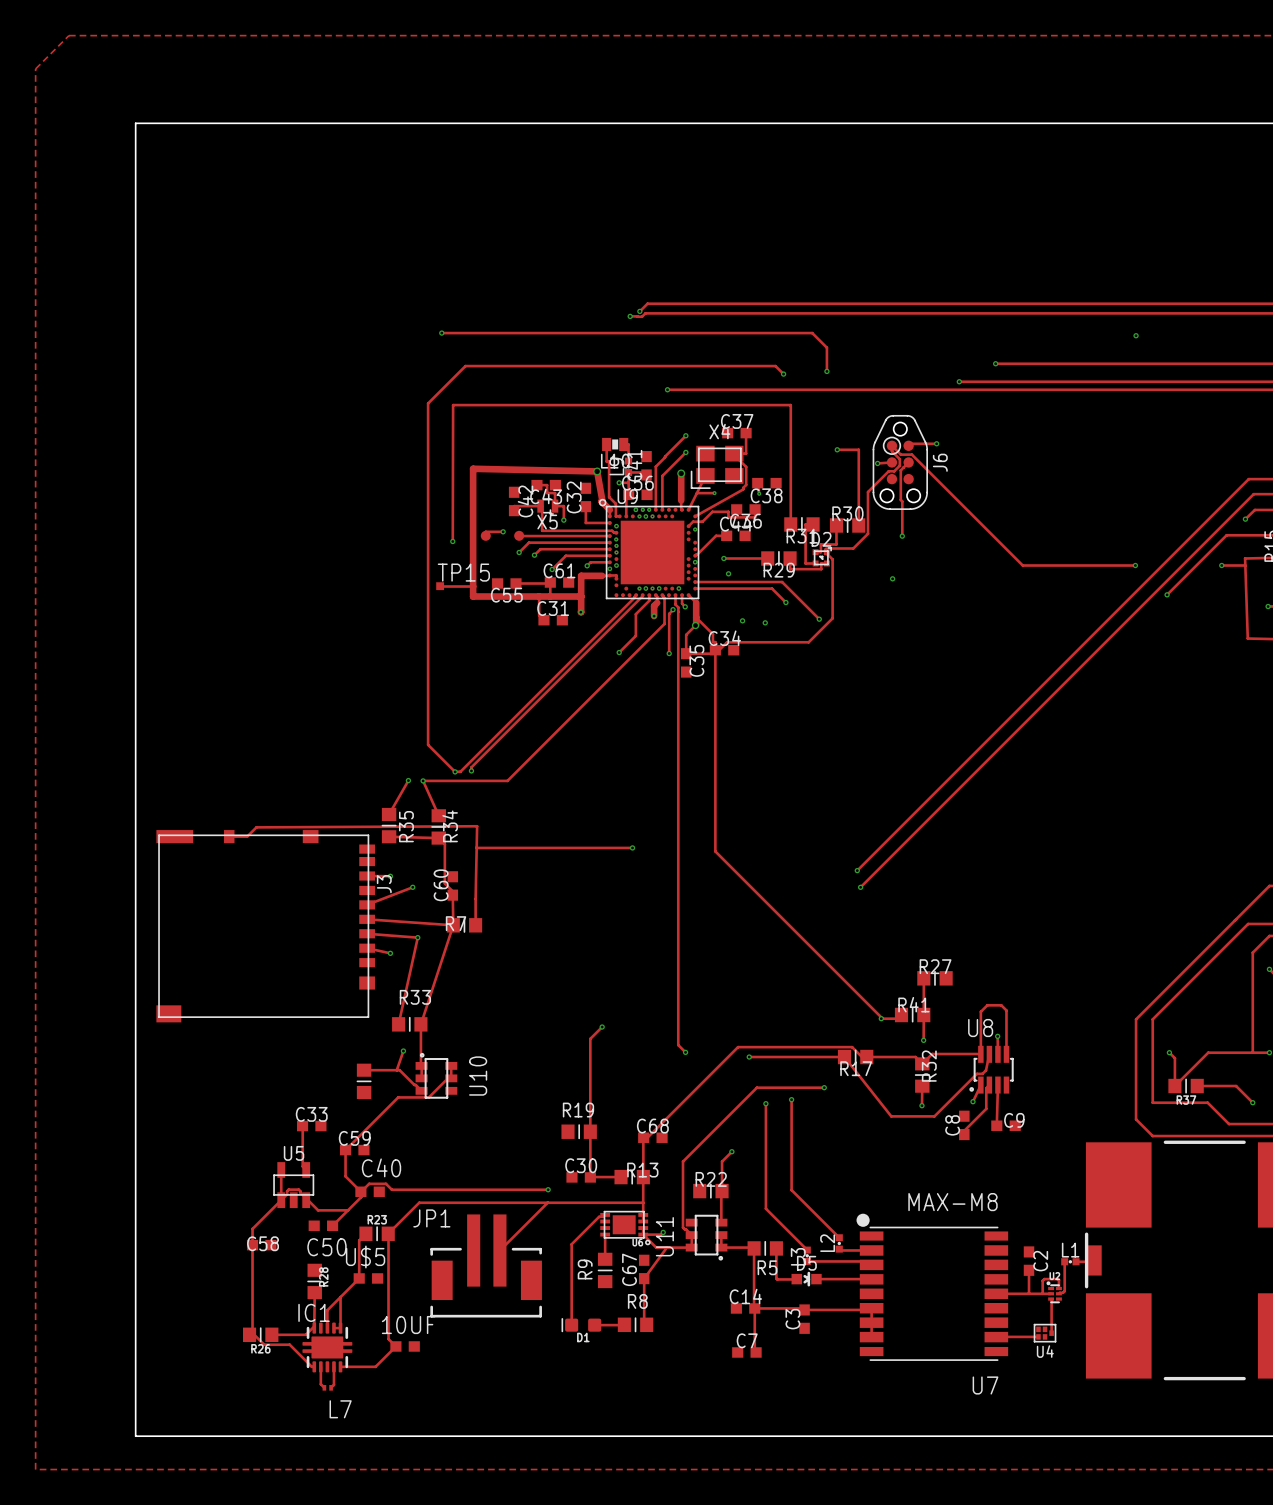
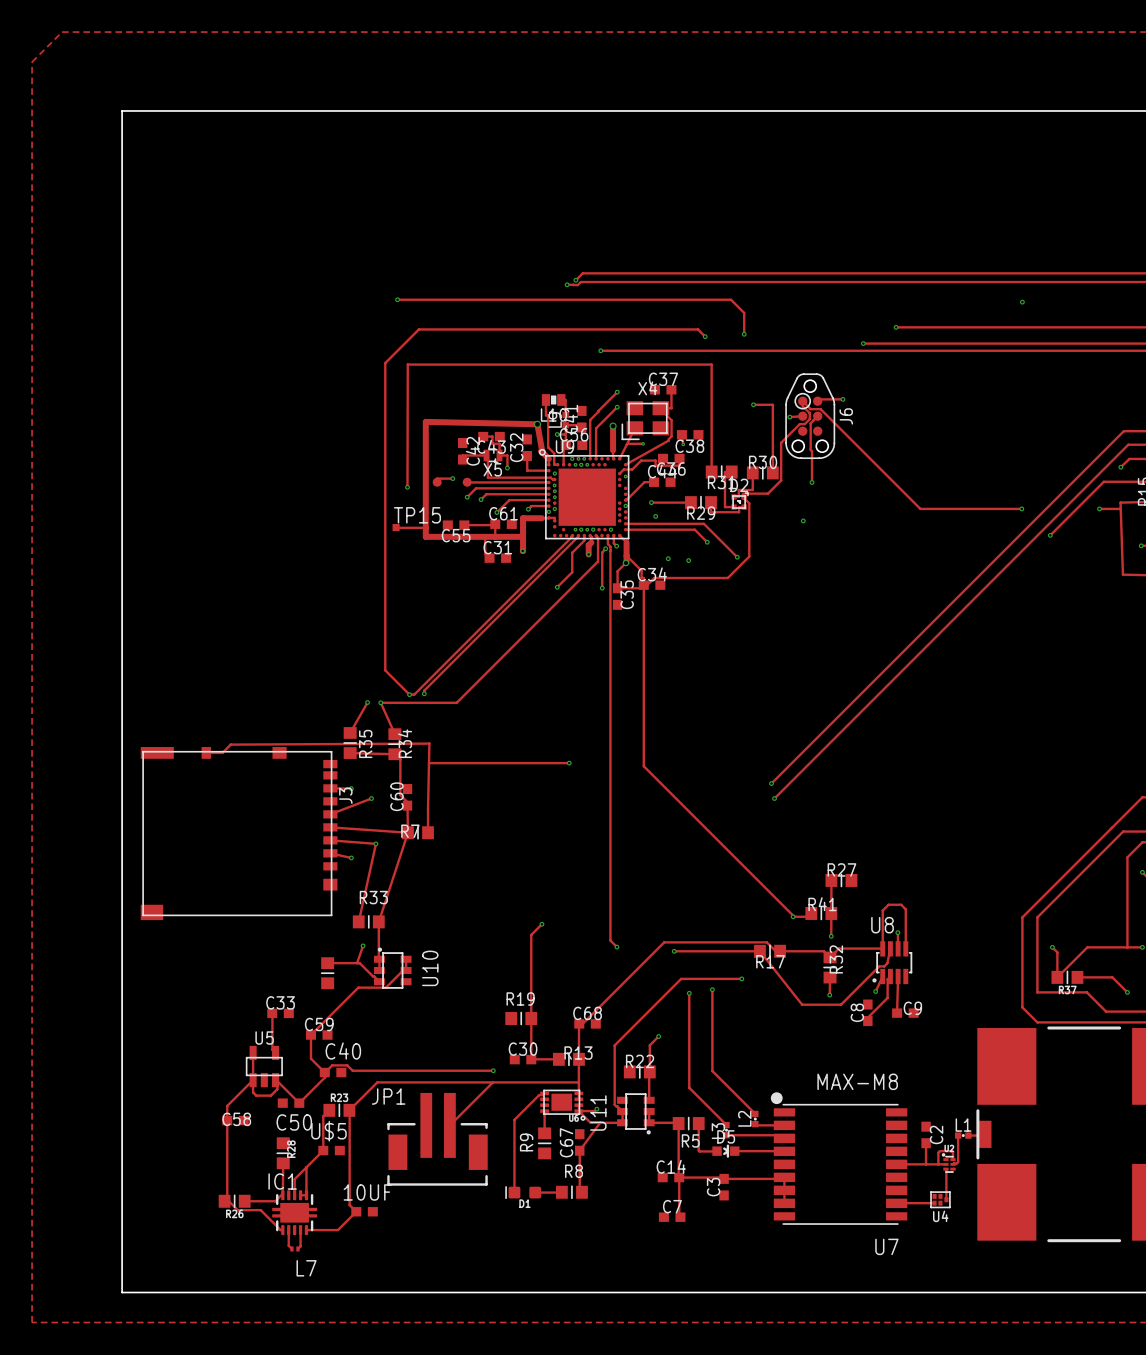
track: (281, 1200) (288, 1189) (298, 1189) (318, 1210) (348, 1210) -> (253, 1080) (253, 1092) (256, 1095) (270, 1095) (277, 1089) (277, 1081)
track: none -> (276, 1080) (299, 1103) (299, 1101)

